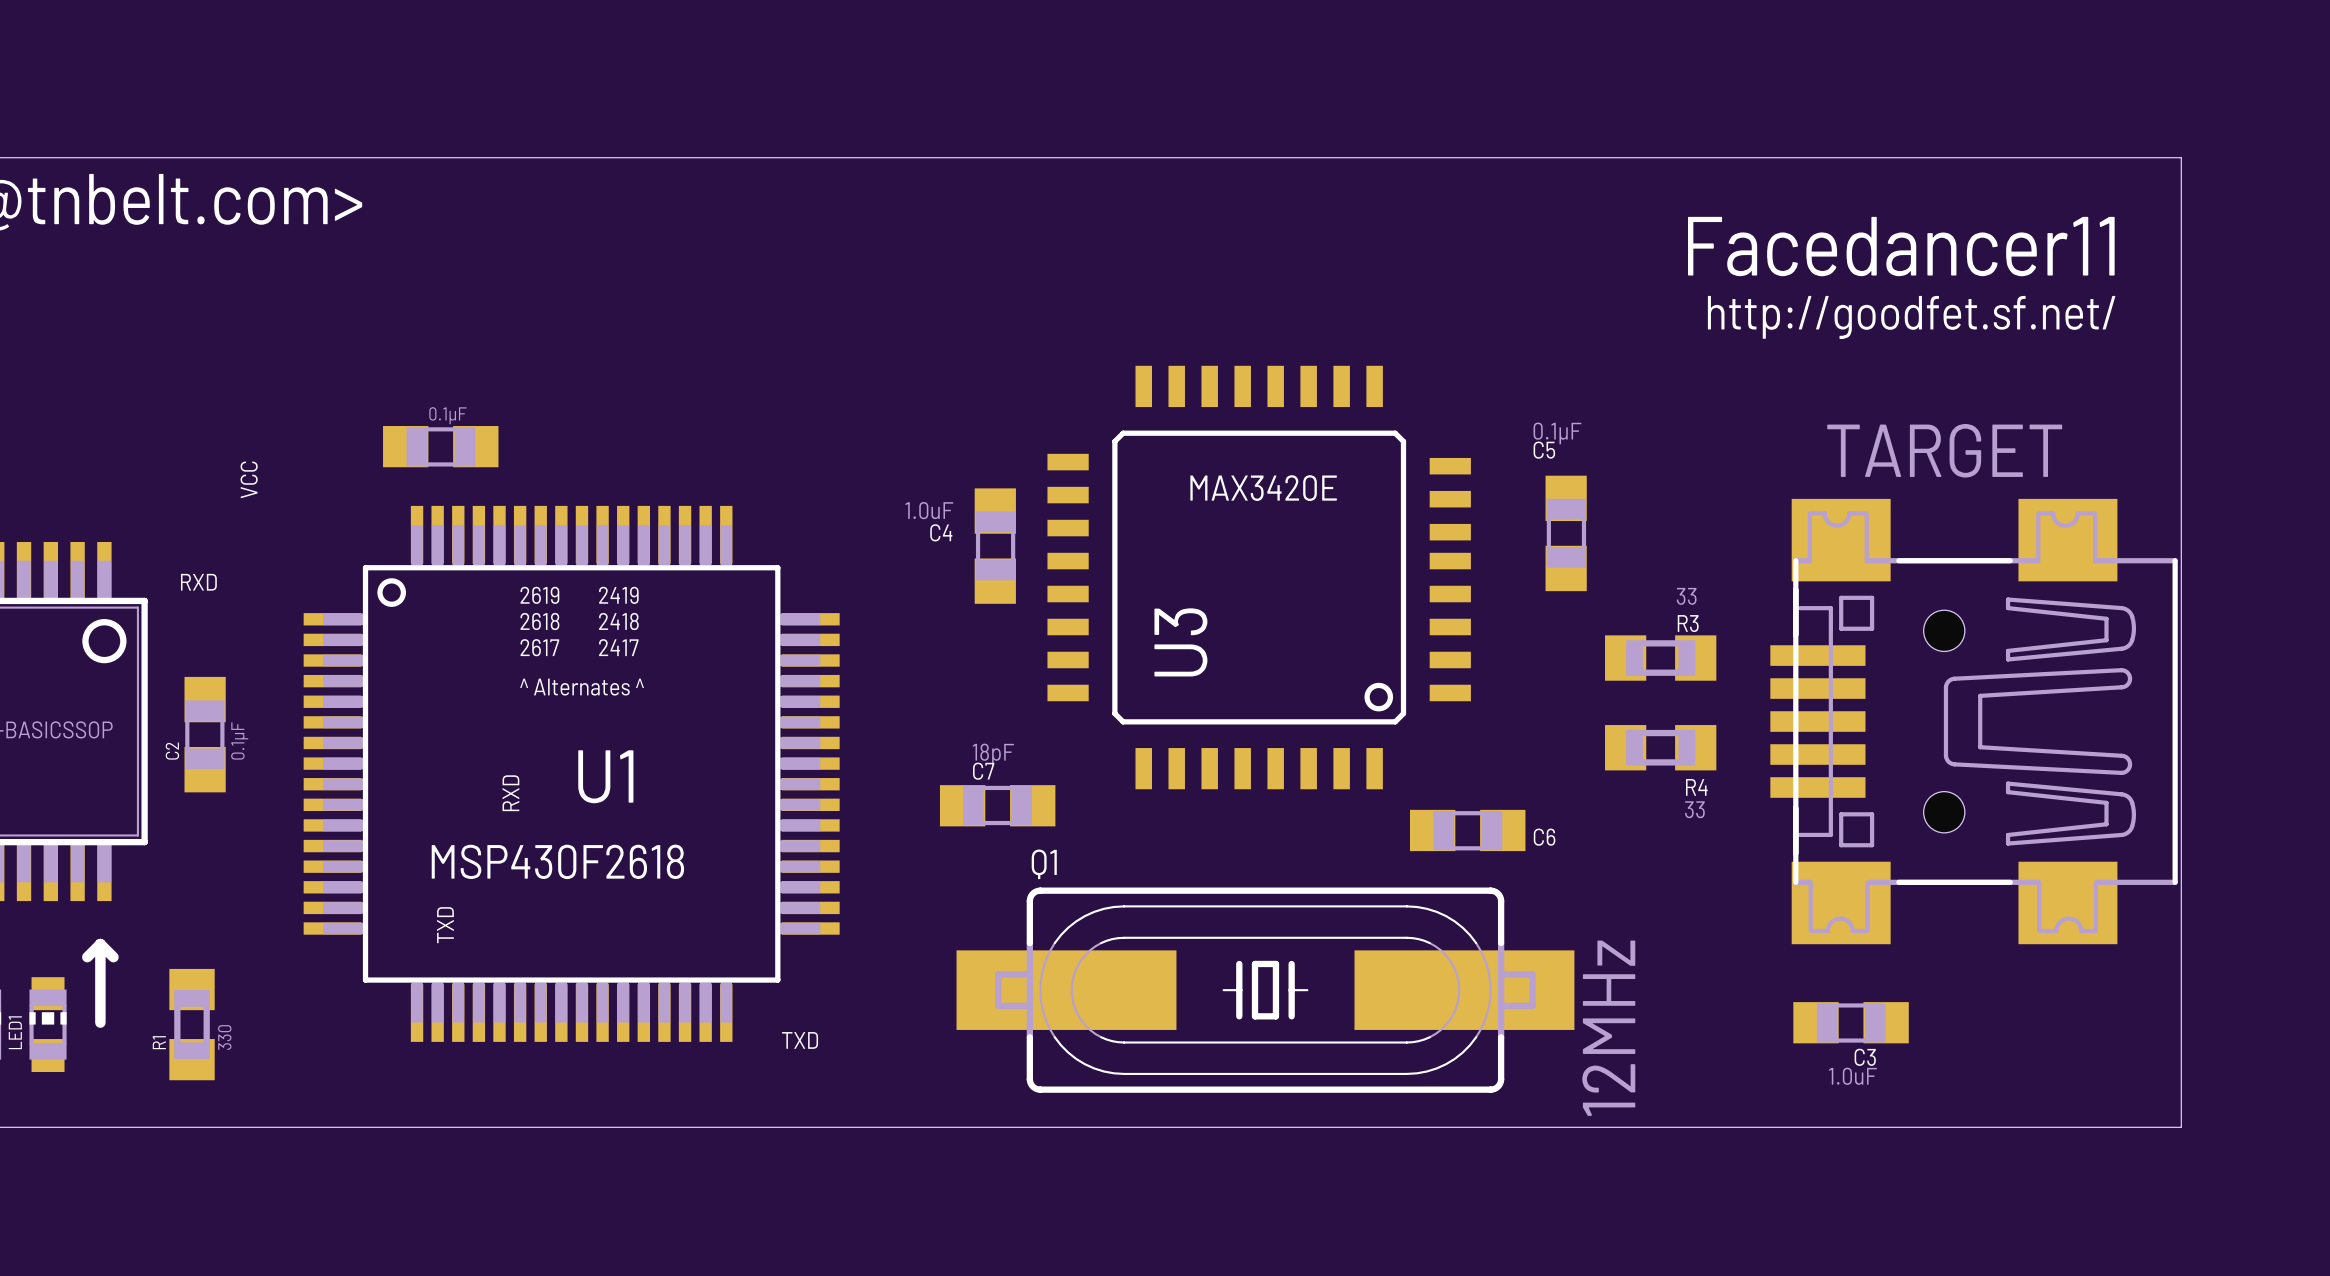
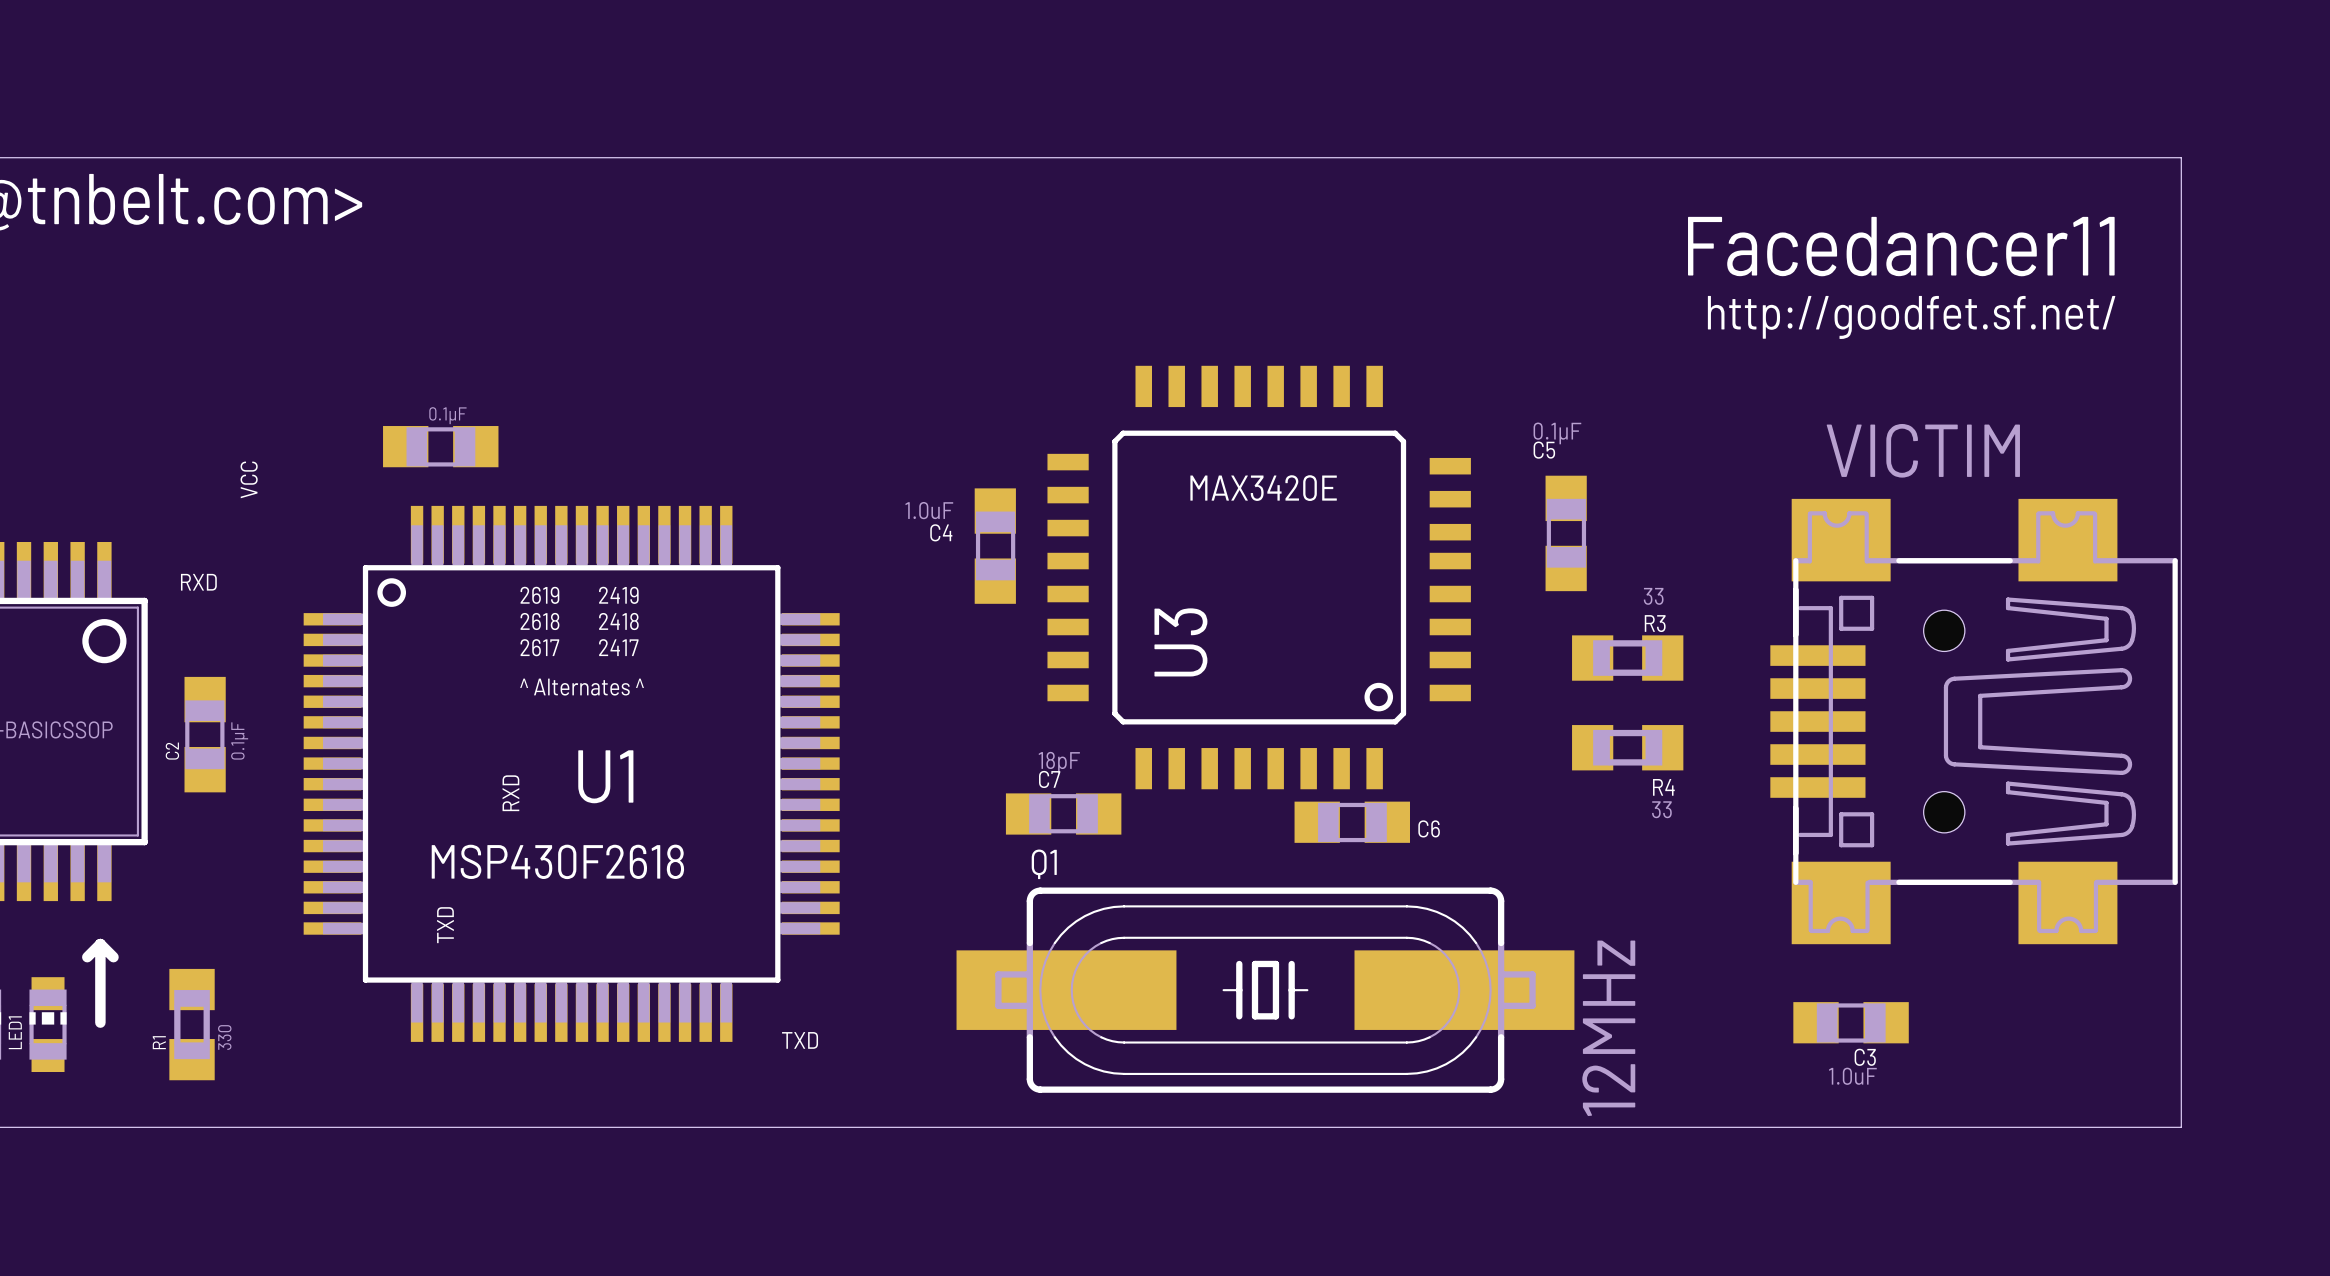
part value: TARGET (1944, 450) -> VICTIM (1923, 450)
R3 position: (1660, 658) -> (1627, 658)
R4 position: (1660, 747) -> (1627, 747)
C7 position: (997, 805) -> (1063, 814)
C6 position: (1467, 830) -> (1352, 822)

